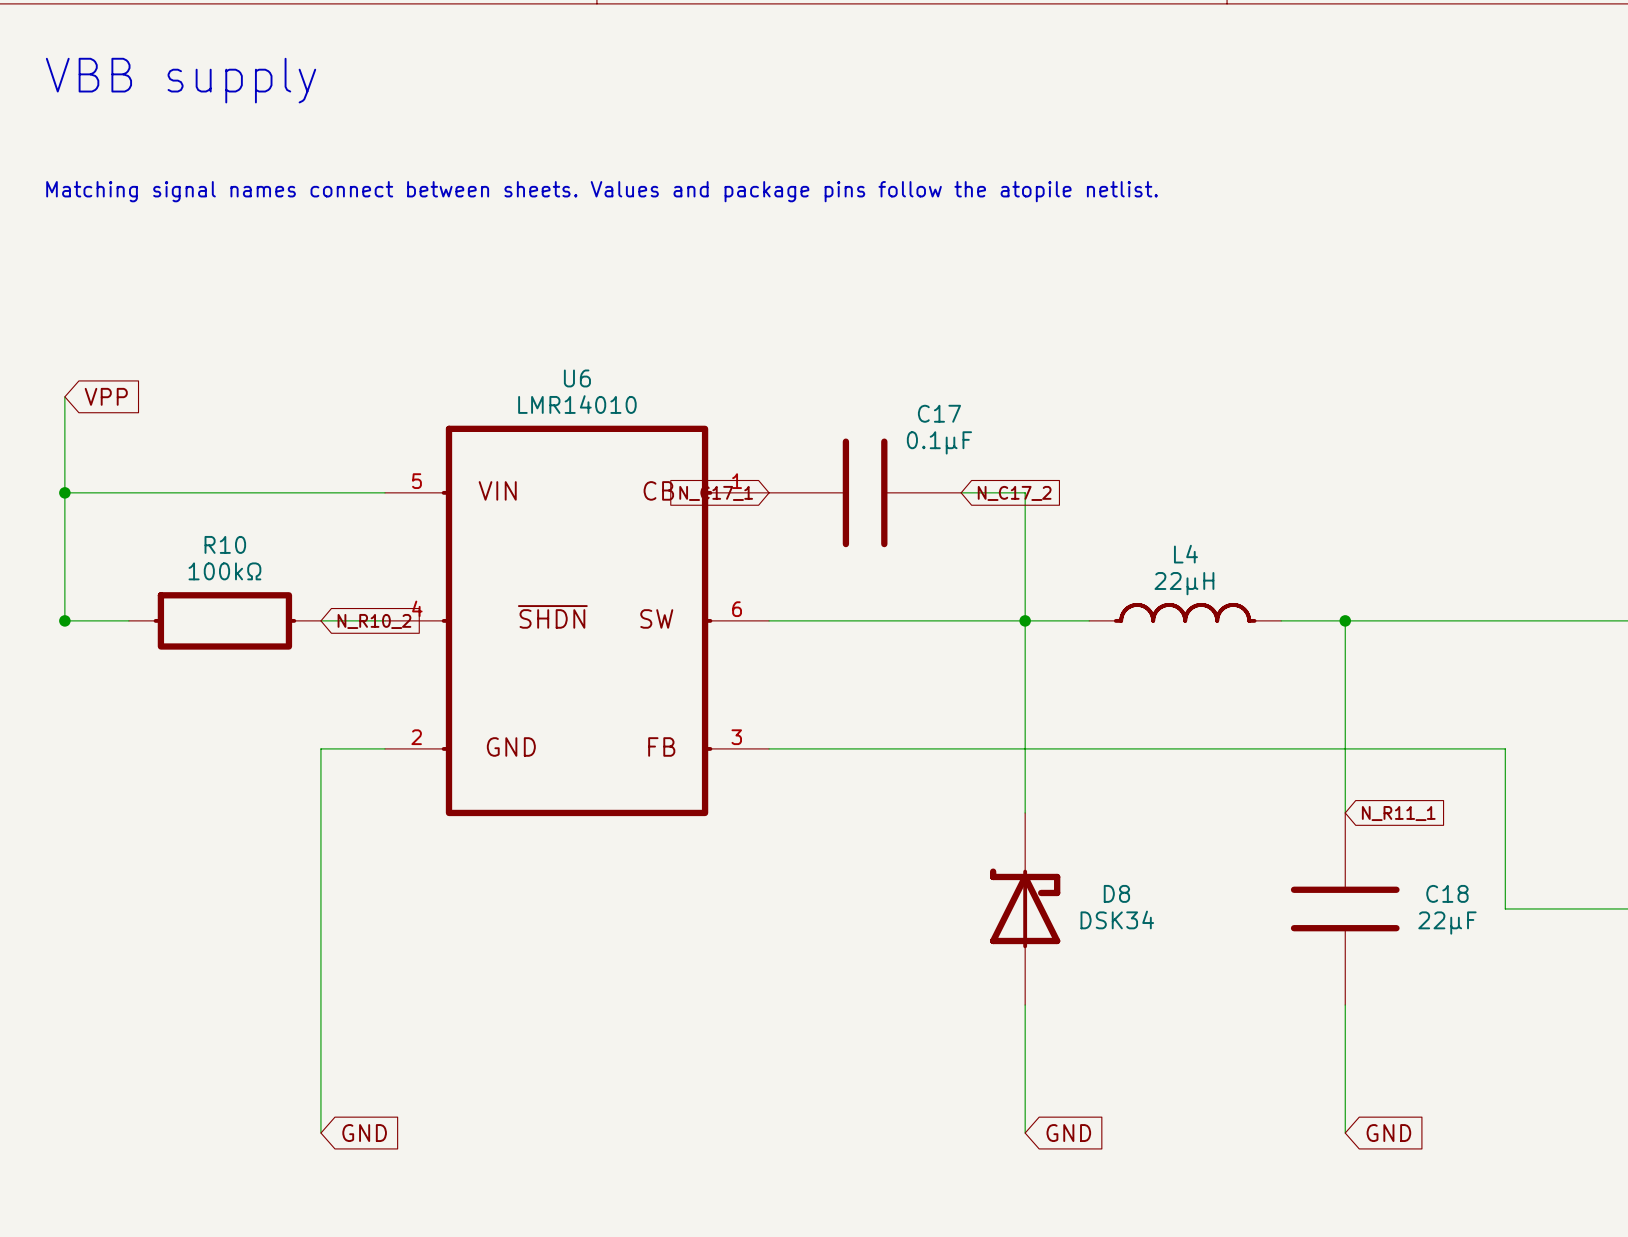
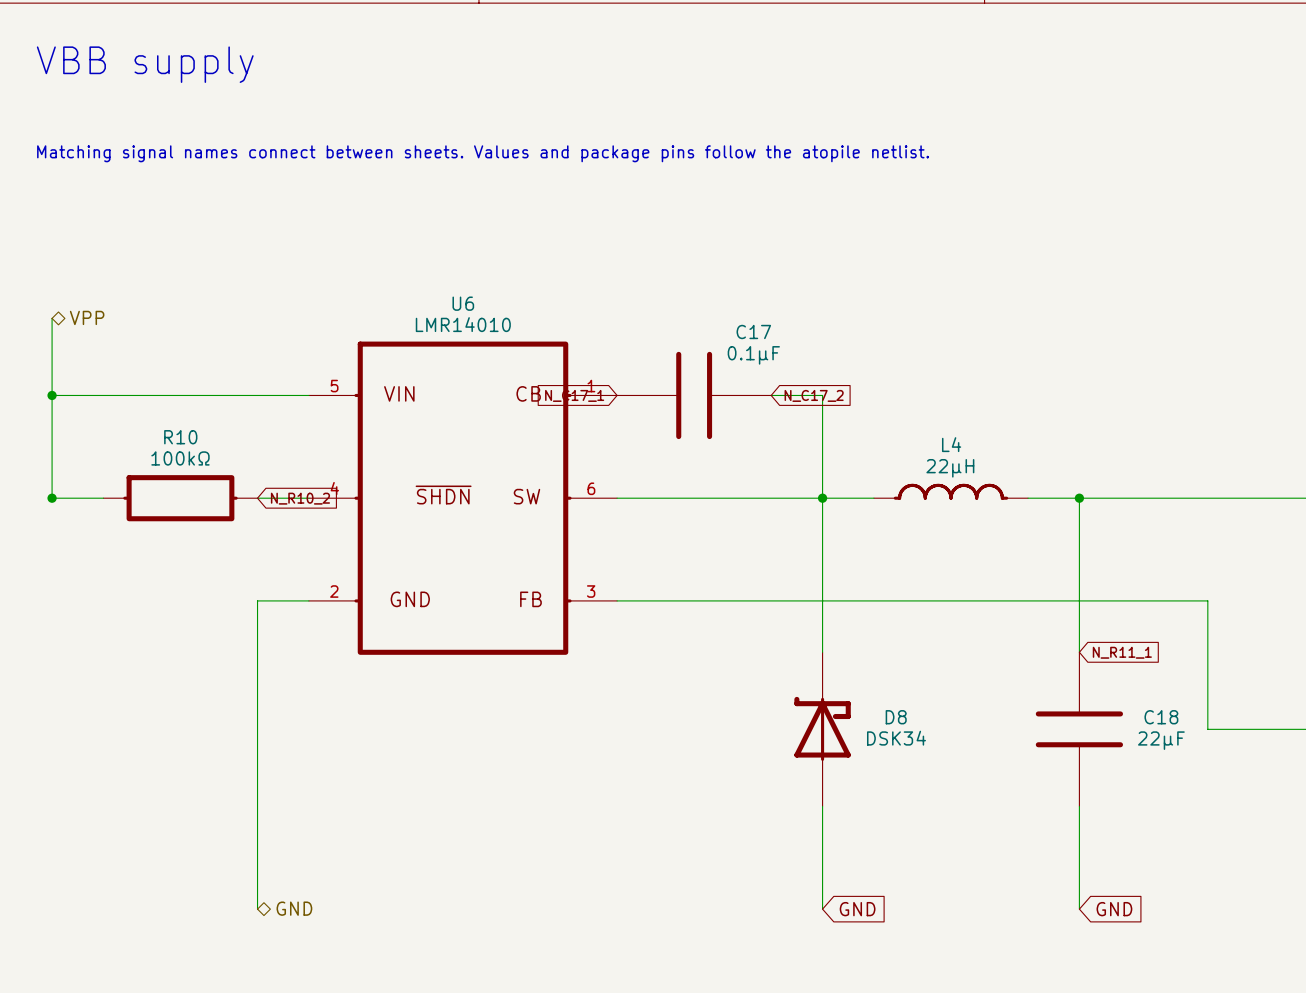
global label: VPP (106, 396) -> none
hierarchical label: none -> VPP (87, 317)
hierarchical label: none -> GND (294, 908)
global label: GND (364, 1133) -> none

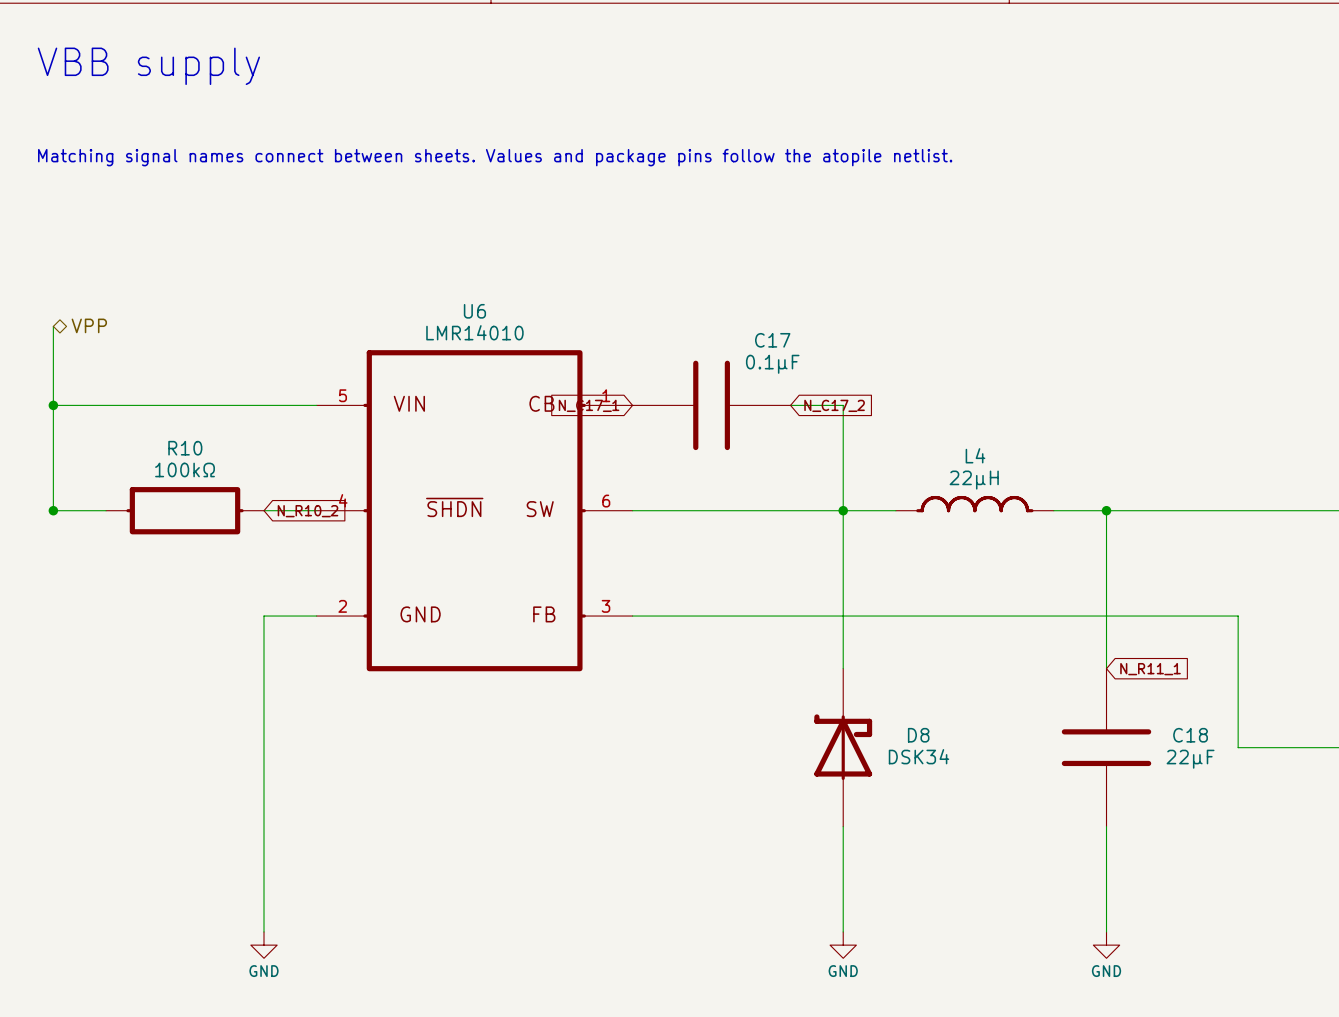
hierarchical label: GND (294, 908) -> none
global label: GND (857, 909) -> none
global label: GND (1114, 909) -> none
power symbol: none -> GND (264, 945)
power symbol: none -> GND (843, 945)
power symbol: none -> GND (1106, 945)

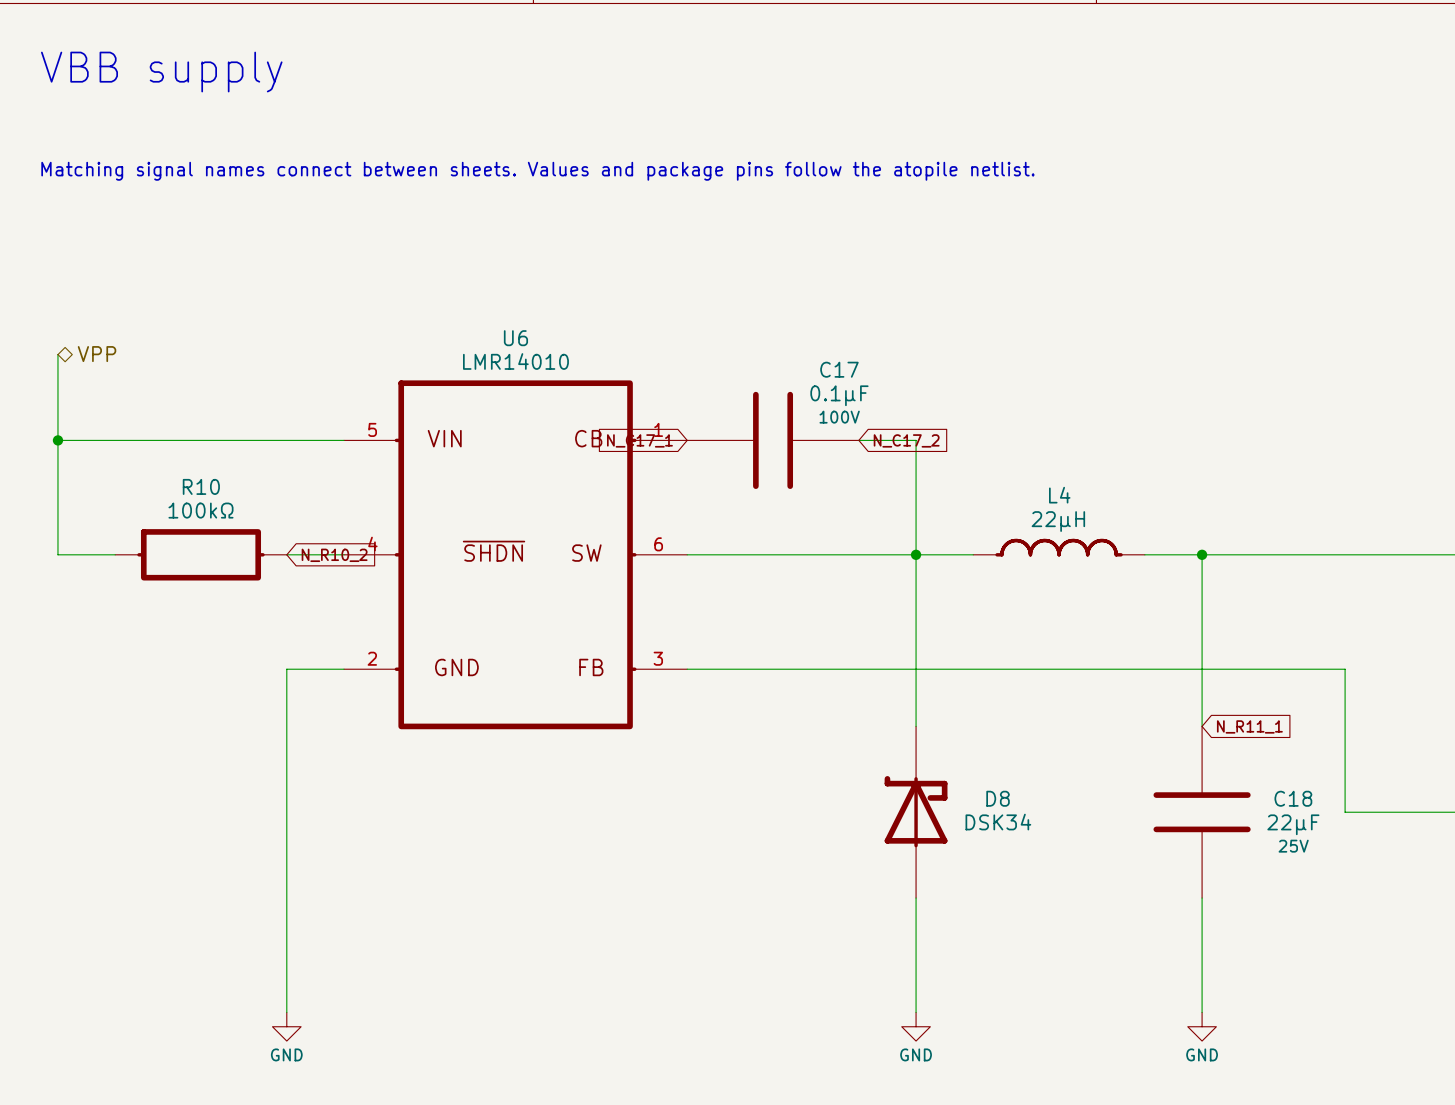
C17 text: none -> 100V (839, 417)
junction: (53, 510) -> none
C18 text: none -> 25V (1293, 846)

